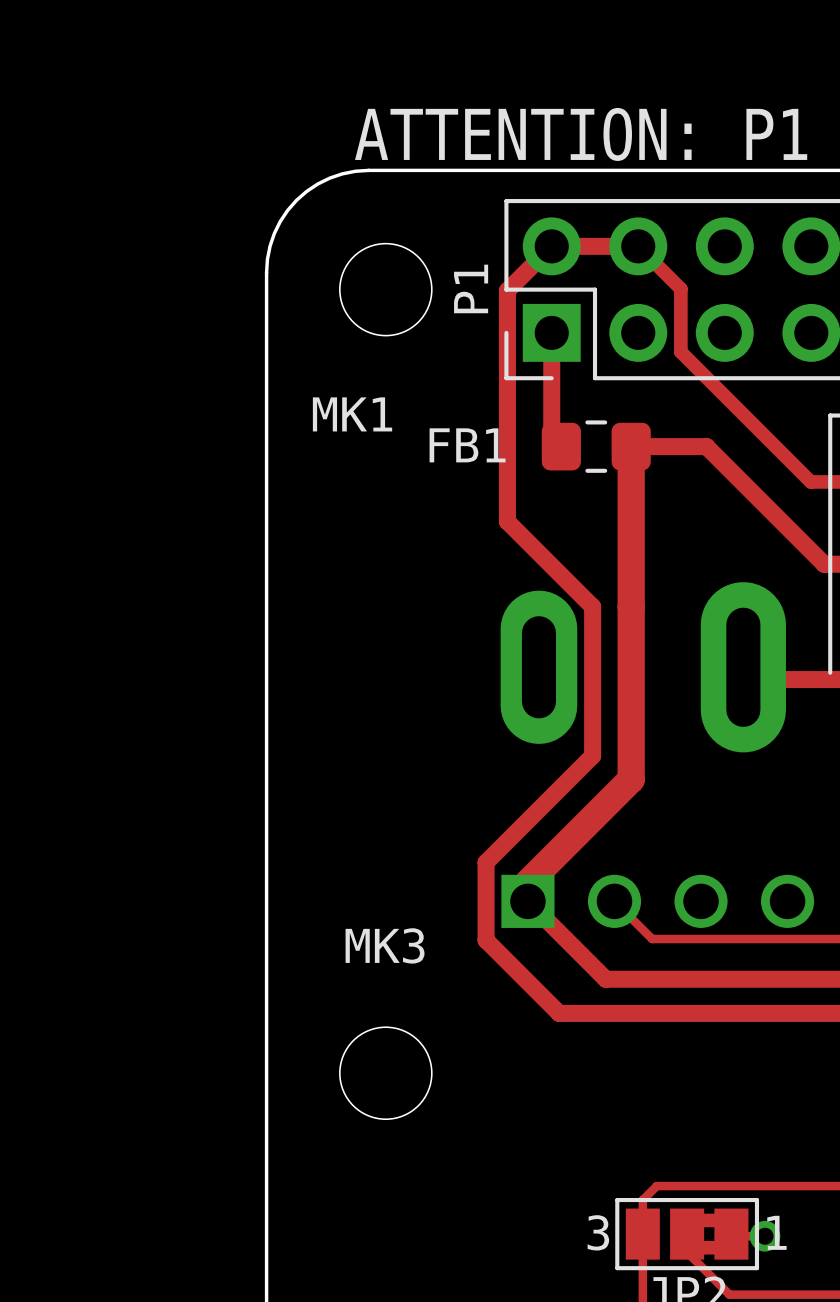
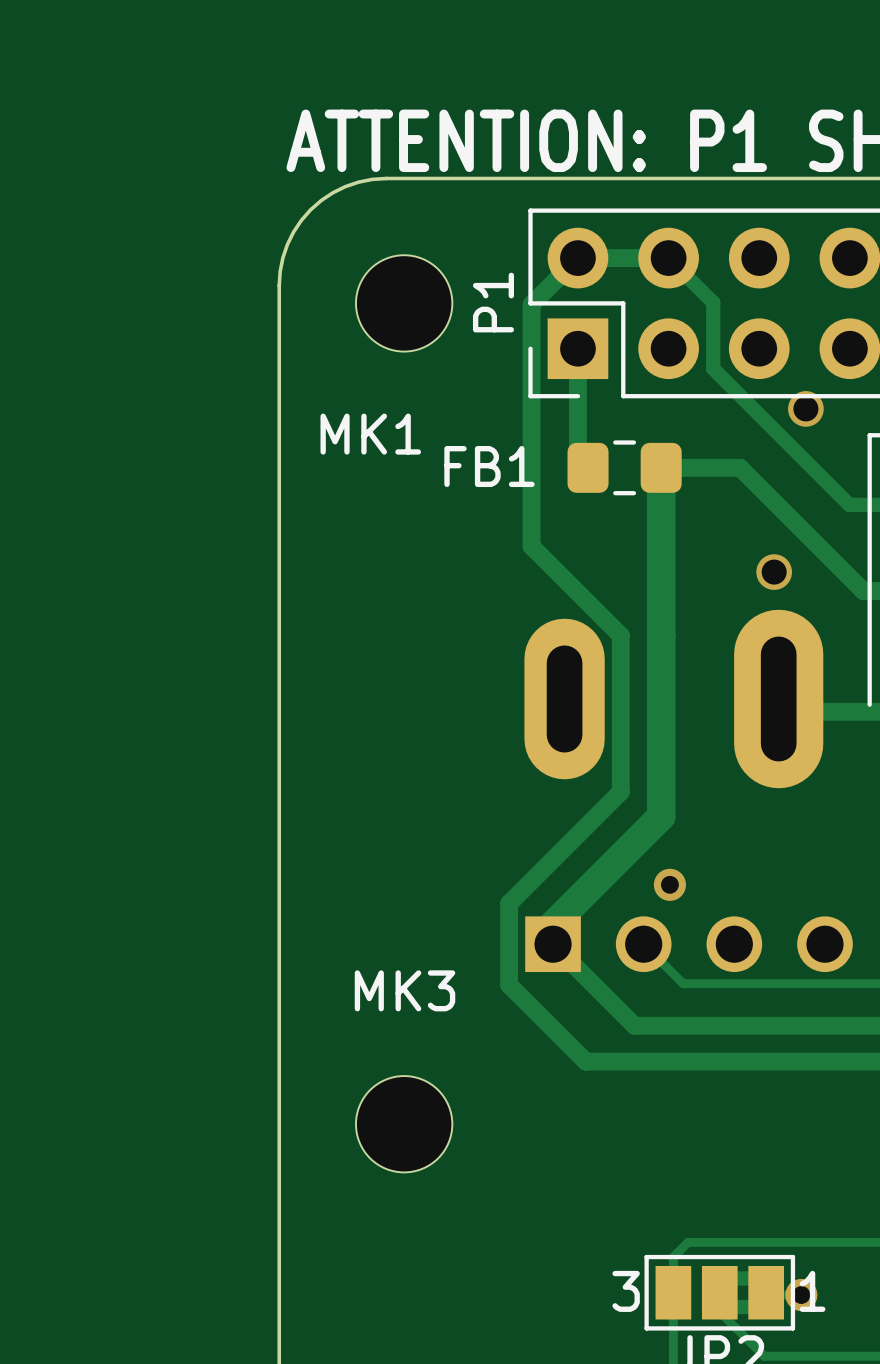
via: none -> (805, 408)
via: none -> (774, 572)
via: none -> (669, 884)

